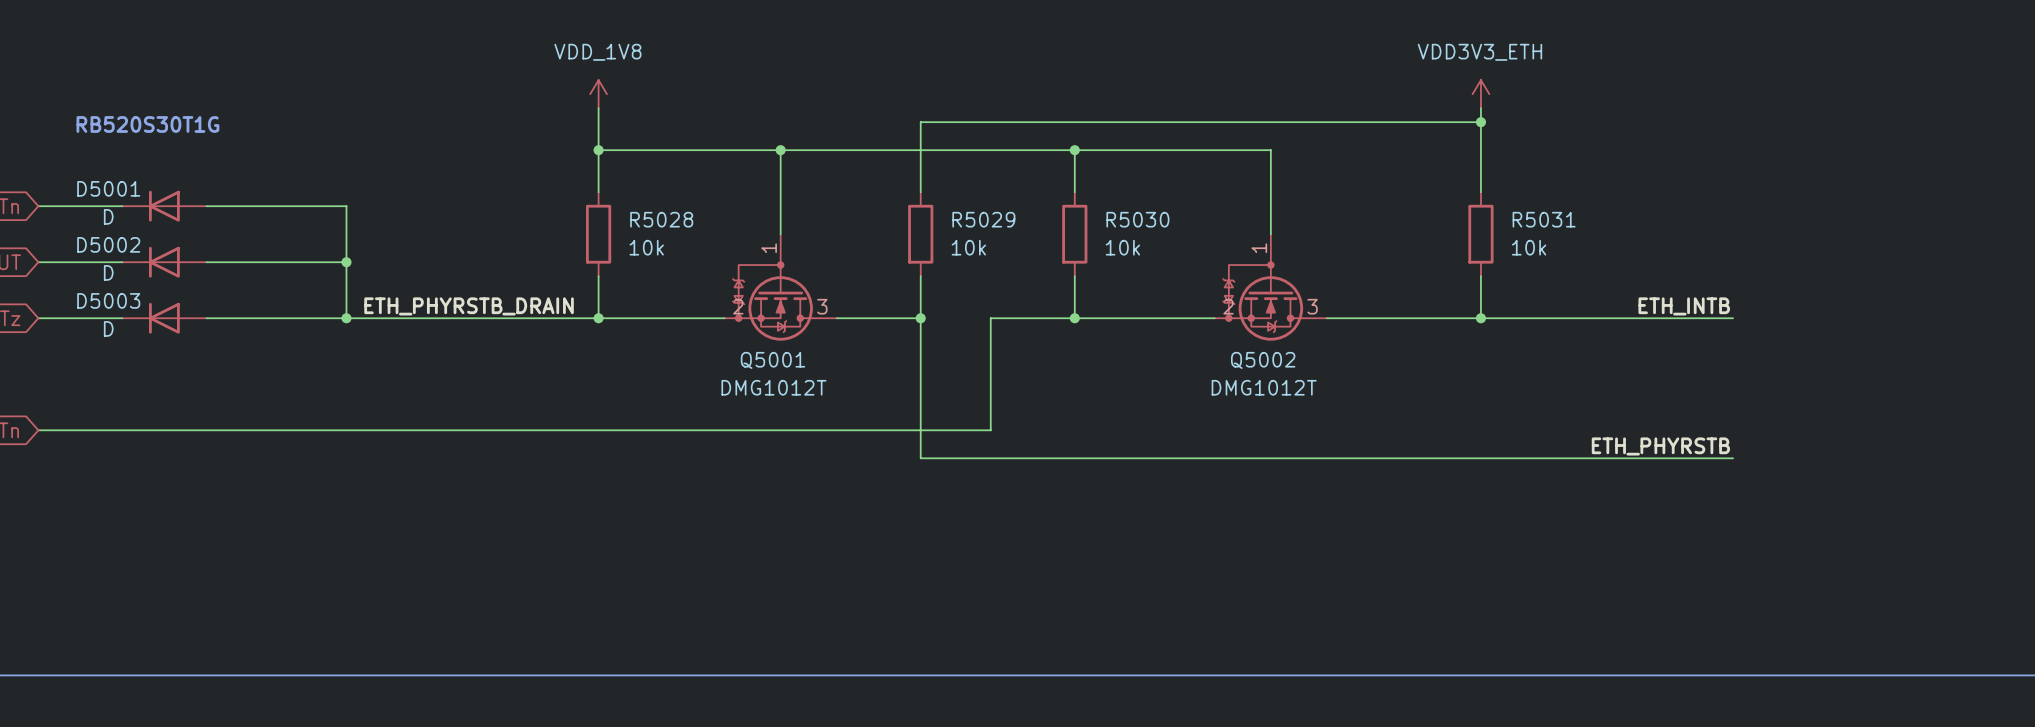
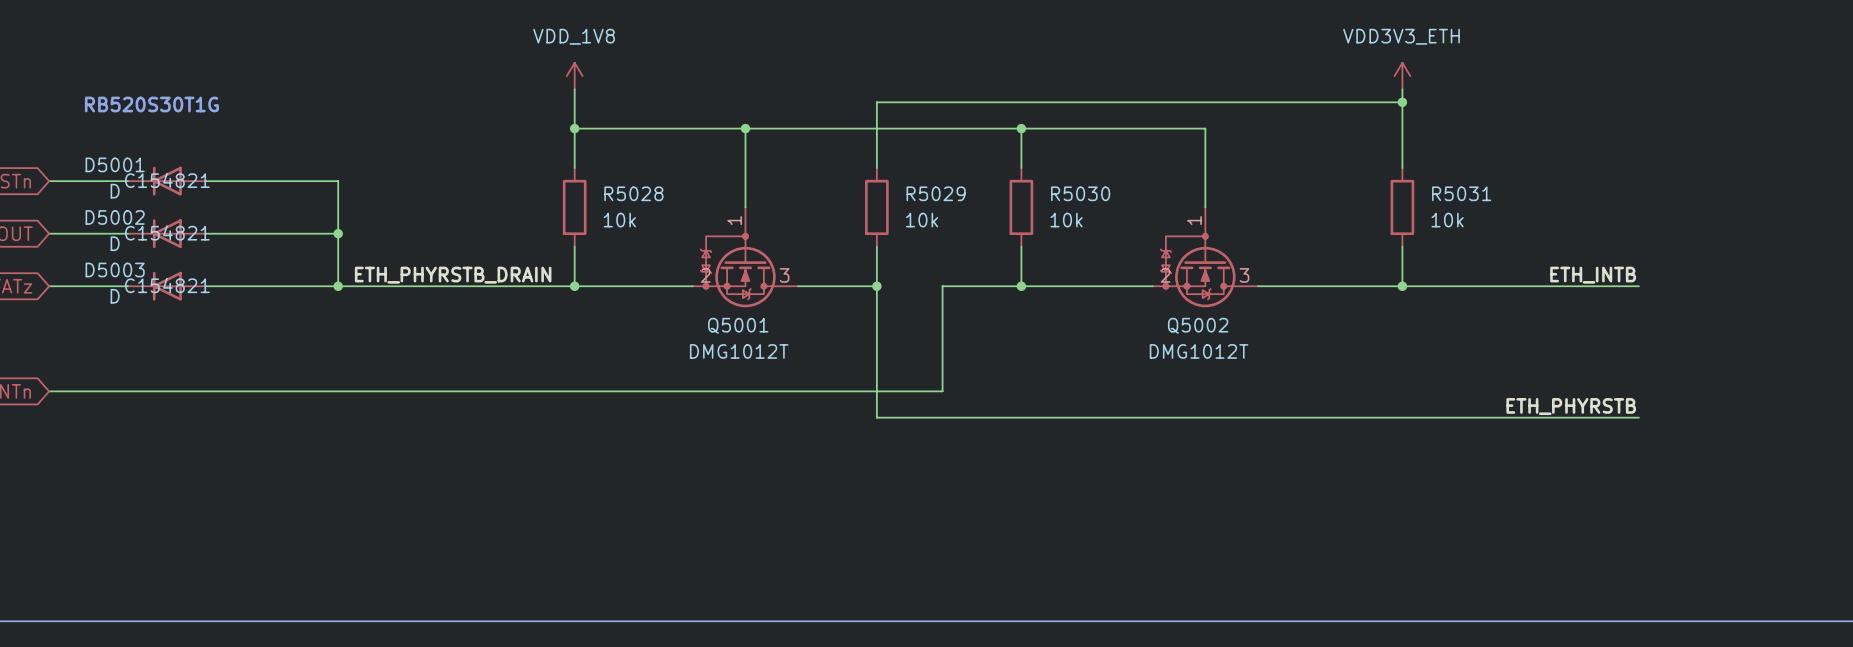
D5001 text: none -> C154821 (167, 180)
D5002 text: none -> C154821 (167, 232)
D5003 text: none -> C154821 (167, 285)

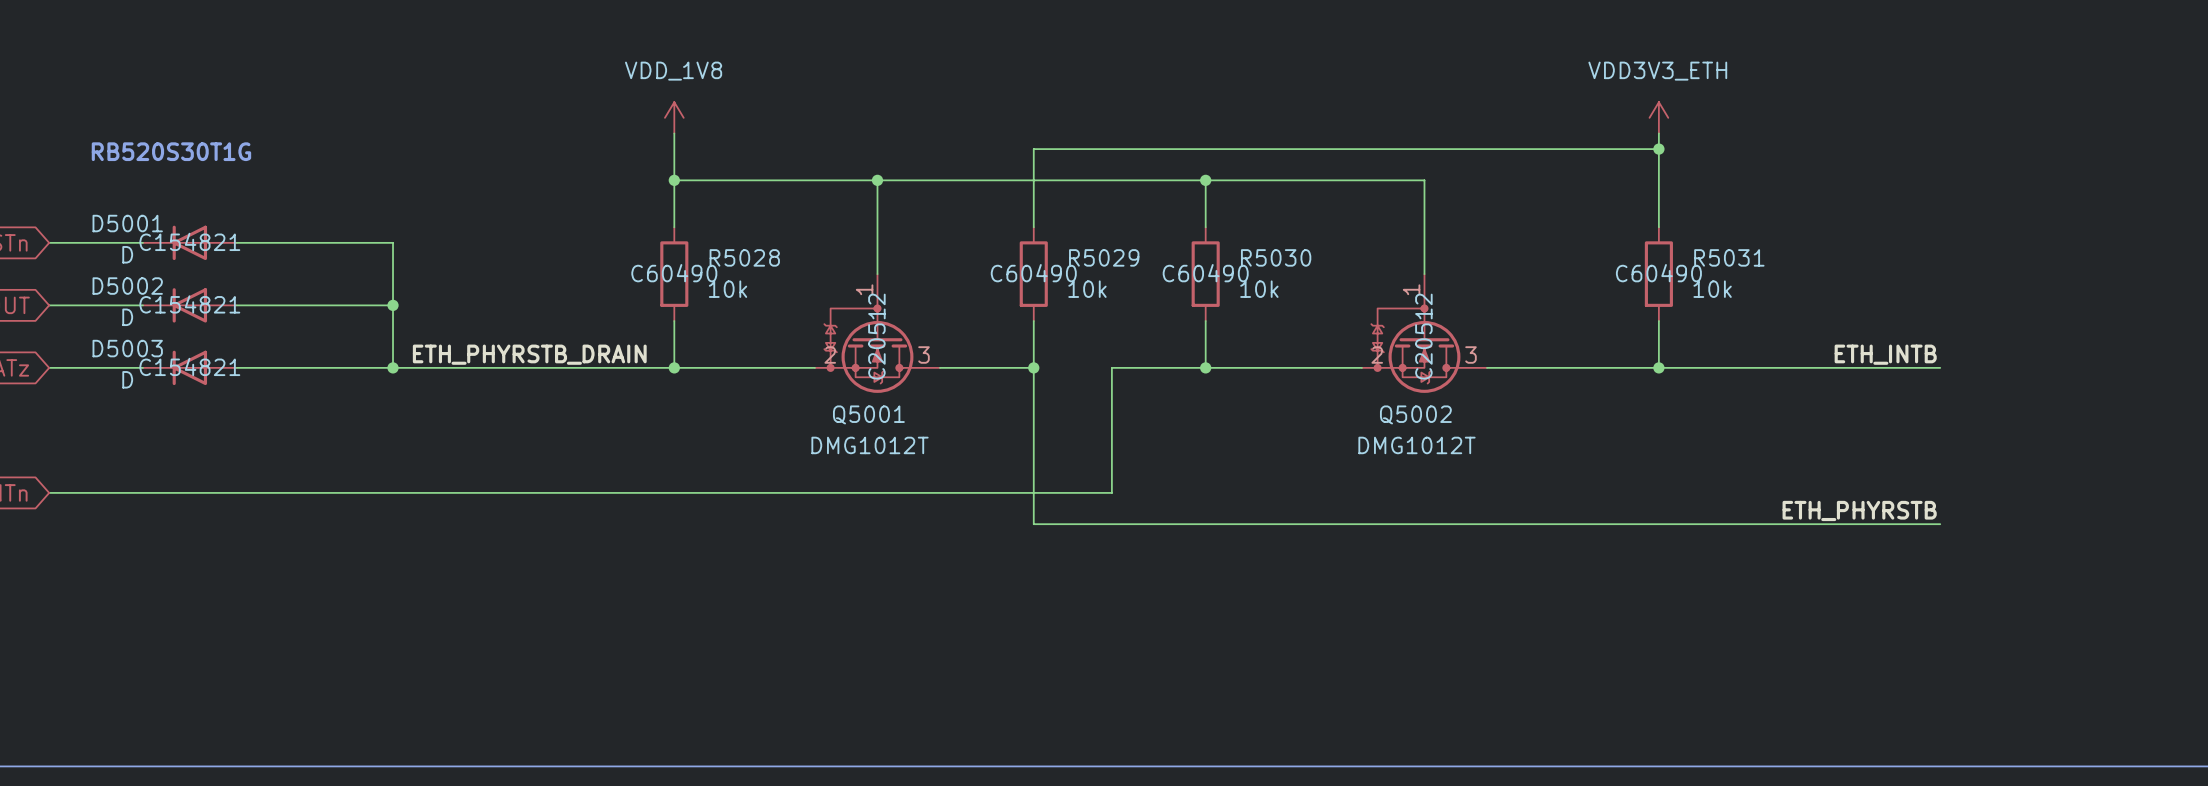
R5028 text: none -> C60490 (674, 273)
R5029 text: none -> C60490 (1033, 273)
R5030 text: none -> C60490 (1205, 273)
R5031 text: none -> C60490 (1658, 273)
Q5001 text: none -> C20512 (876, 336)
Q5002 text: none -> C20512 (1423, 336)

